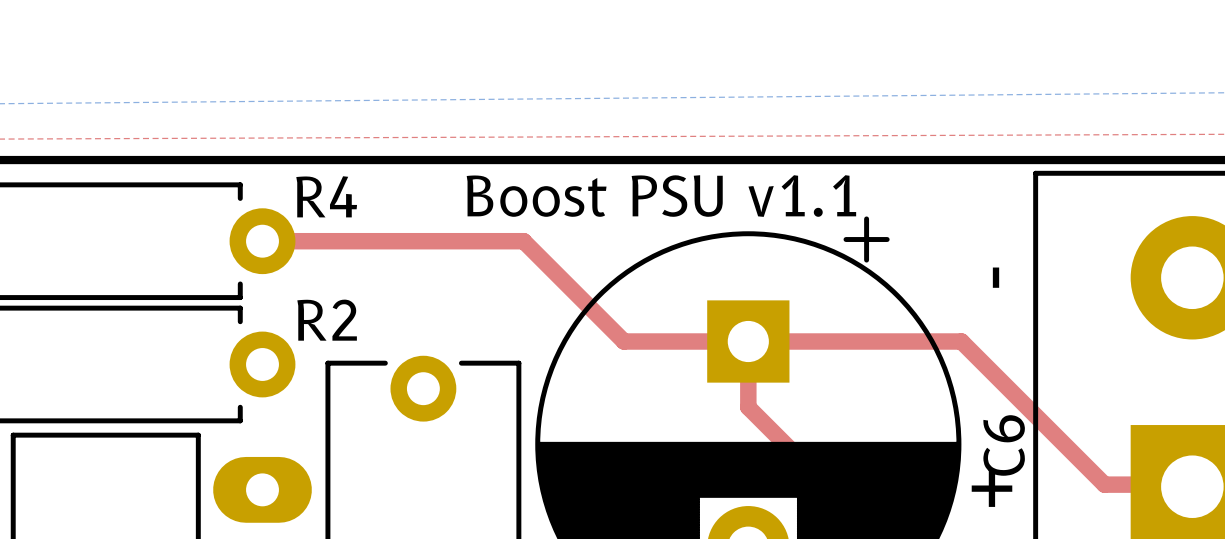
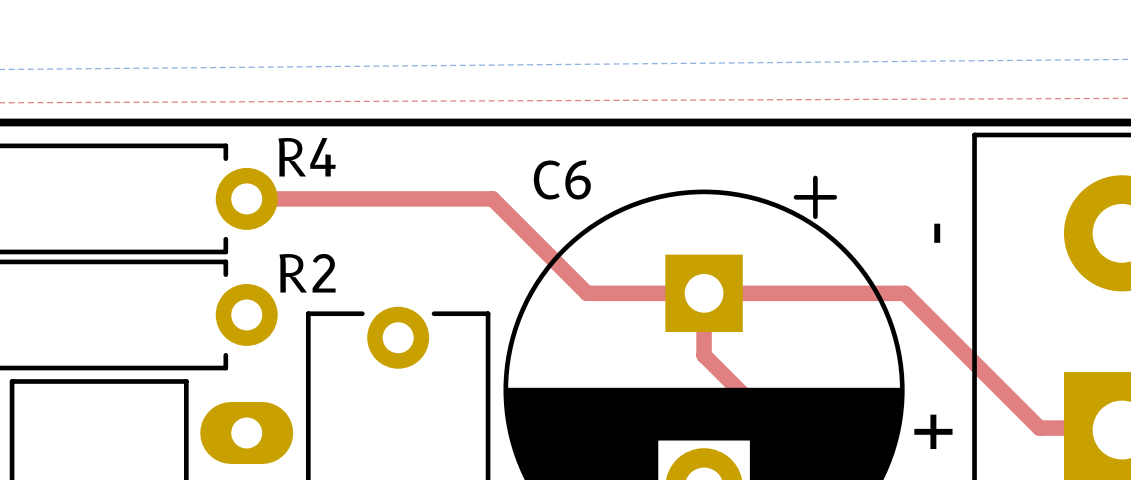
text: Boost PSU v1.1 (661, 196) -> none
C6 name rotation: 0° (1004, 445) -> 90° clockwise (562, 180)
C6 name position: C6 (1004, 445) -> C6 (562, 180)

